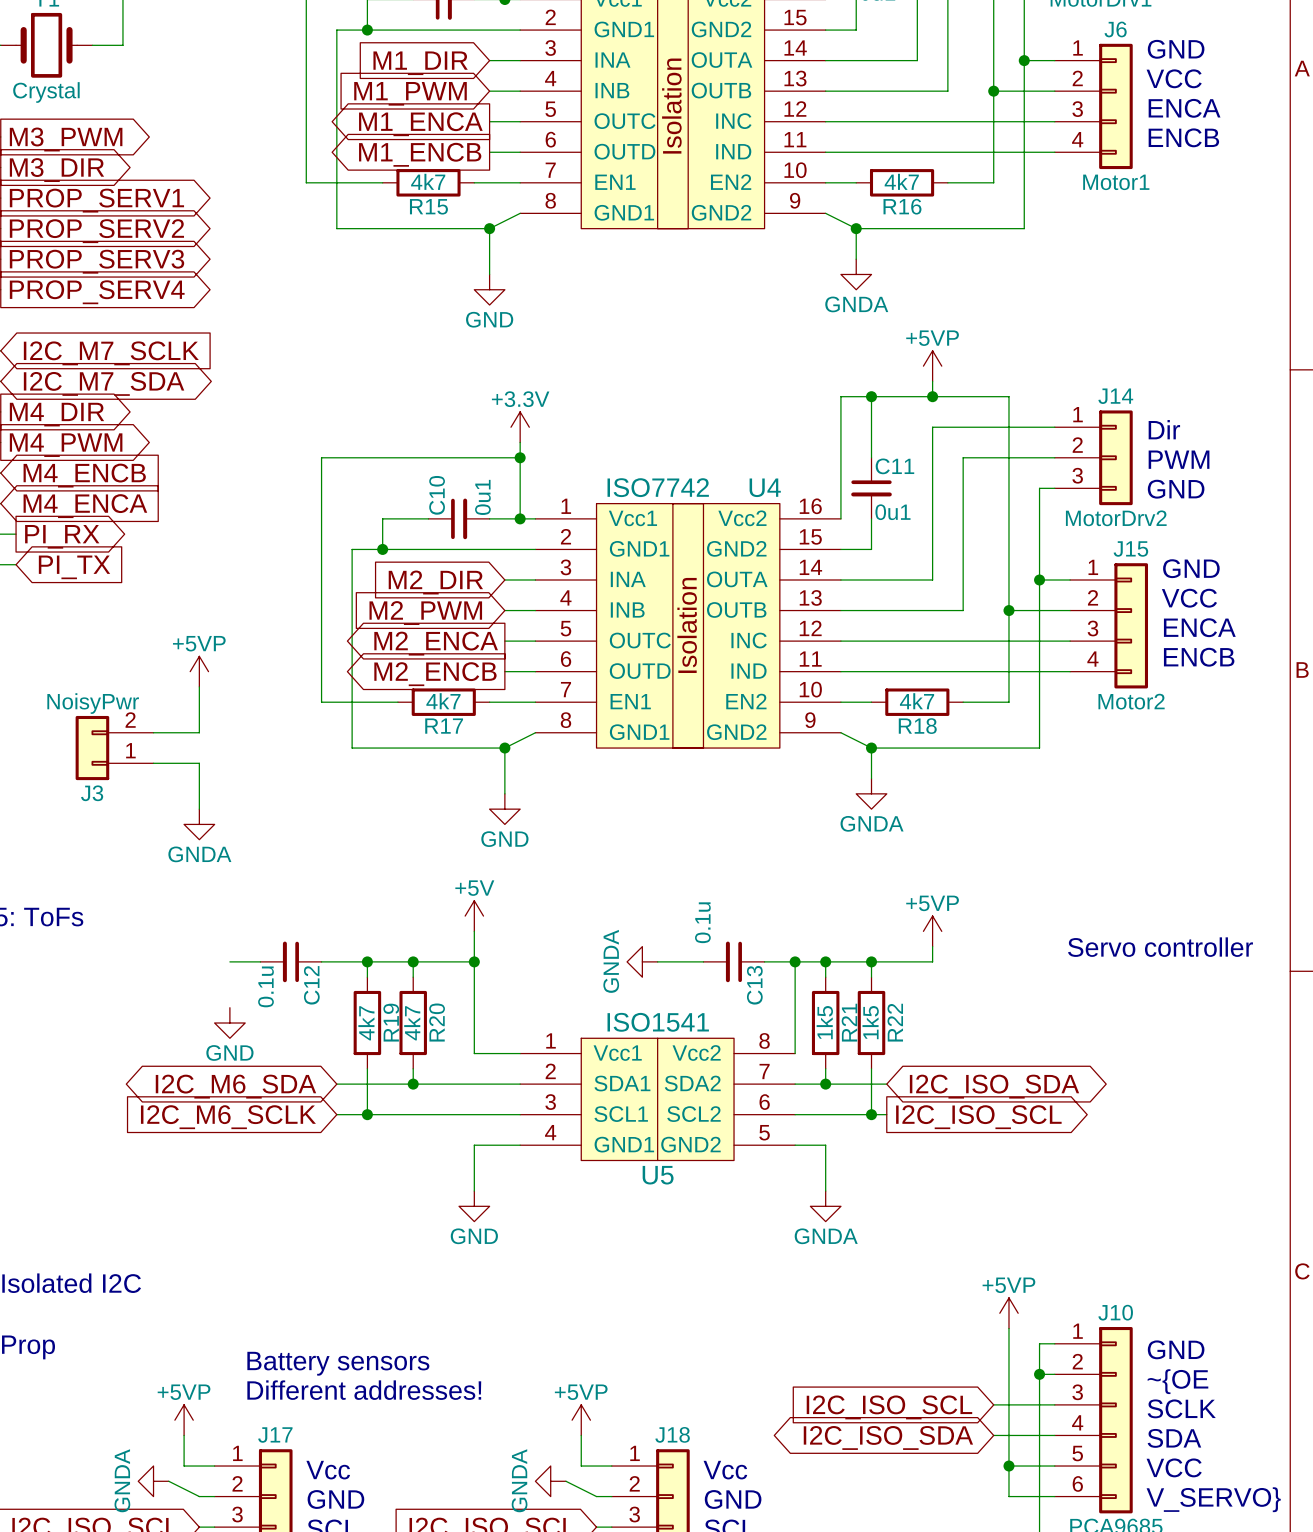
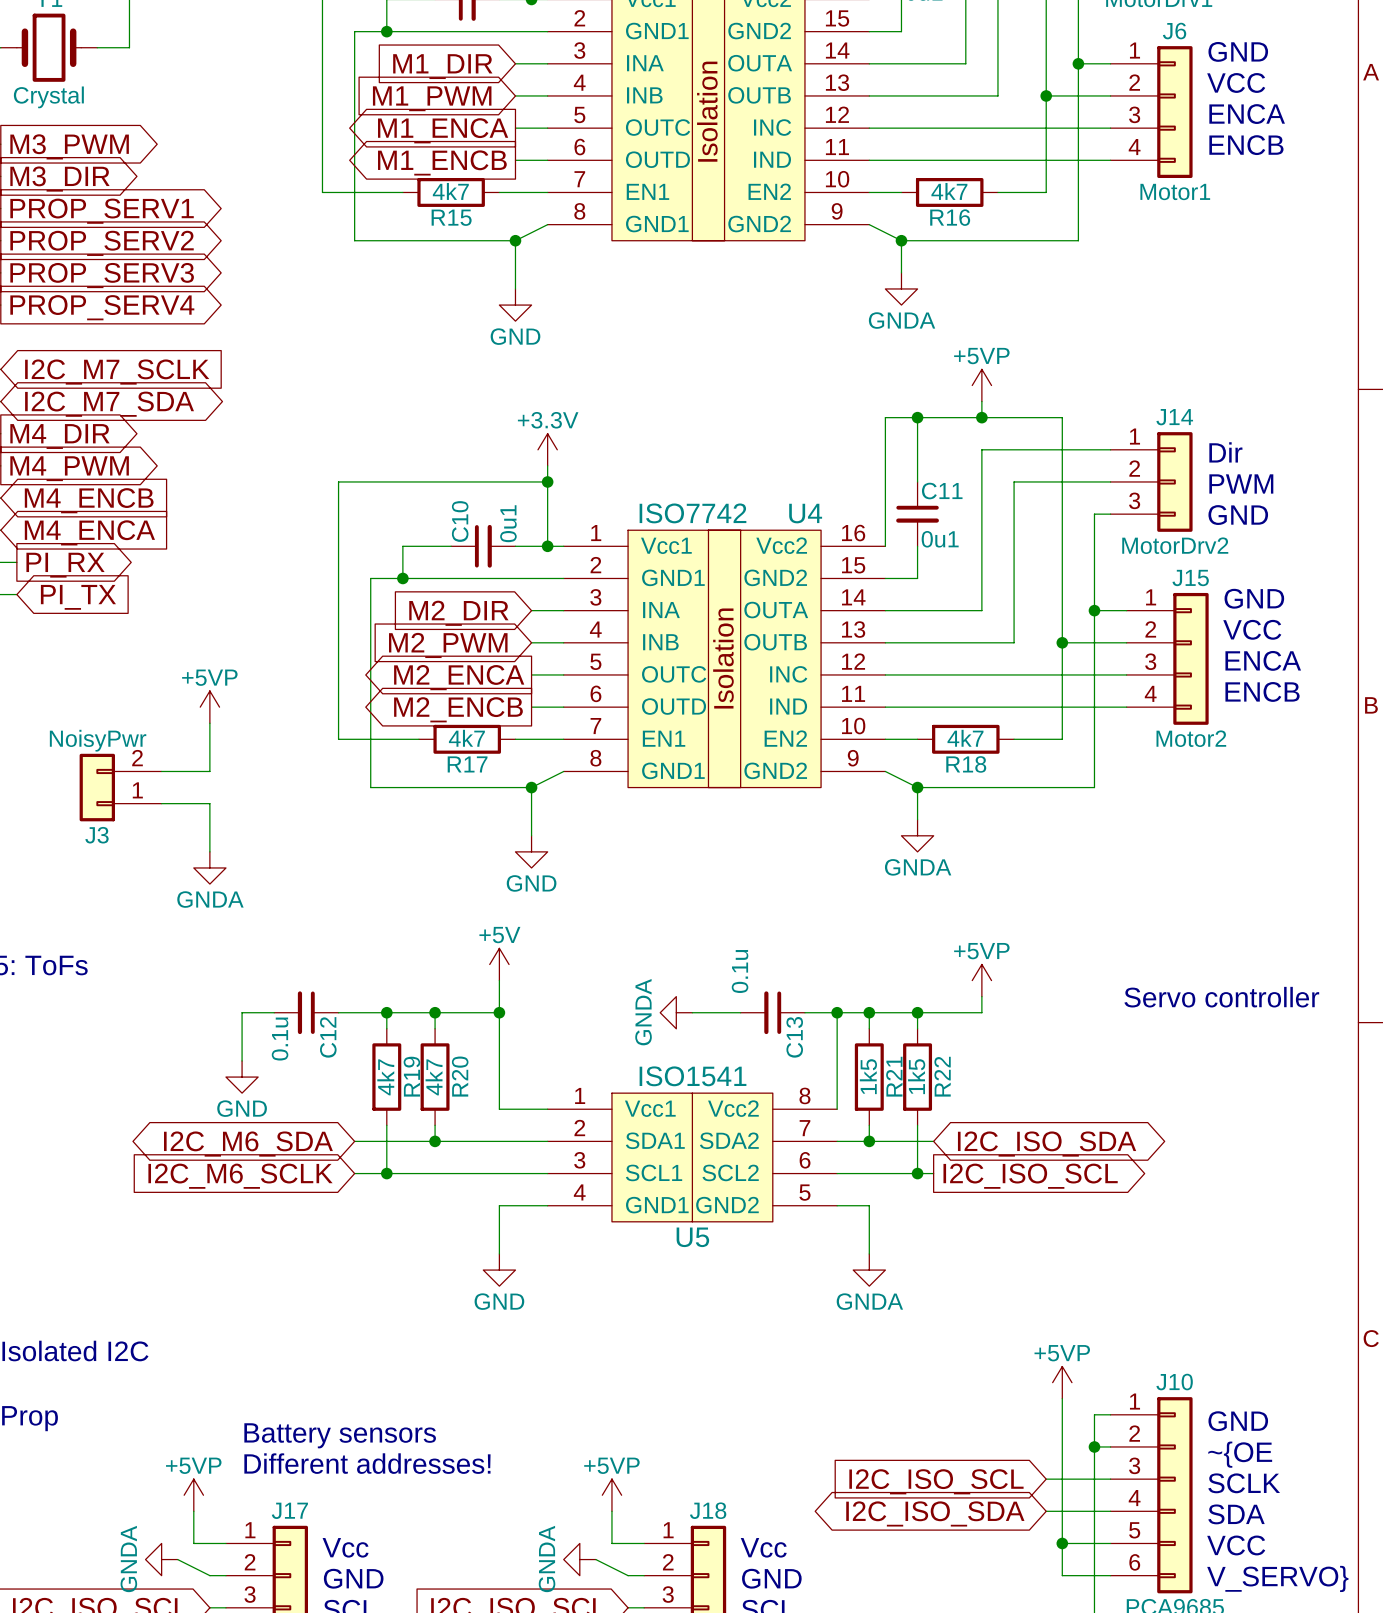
wire: none -> (242, 1012) (242, 1060)
text position: Battery sensors (338, 1363) -> Battery sensors (340, 1435)
text position: Different addresses! (364, 1390) -> Different addresses! (367, 1463)

